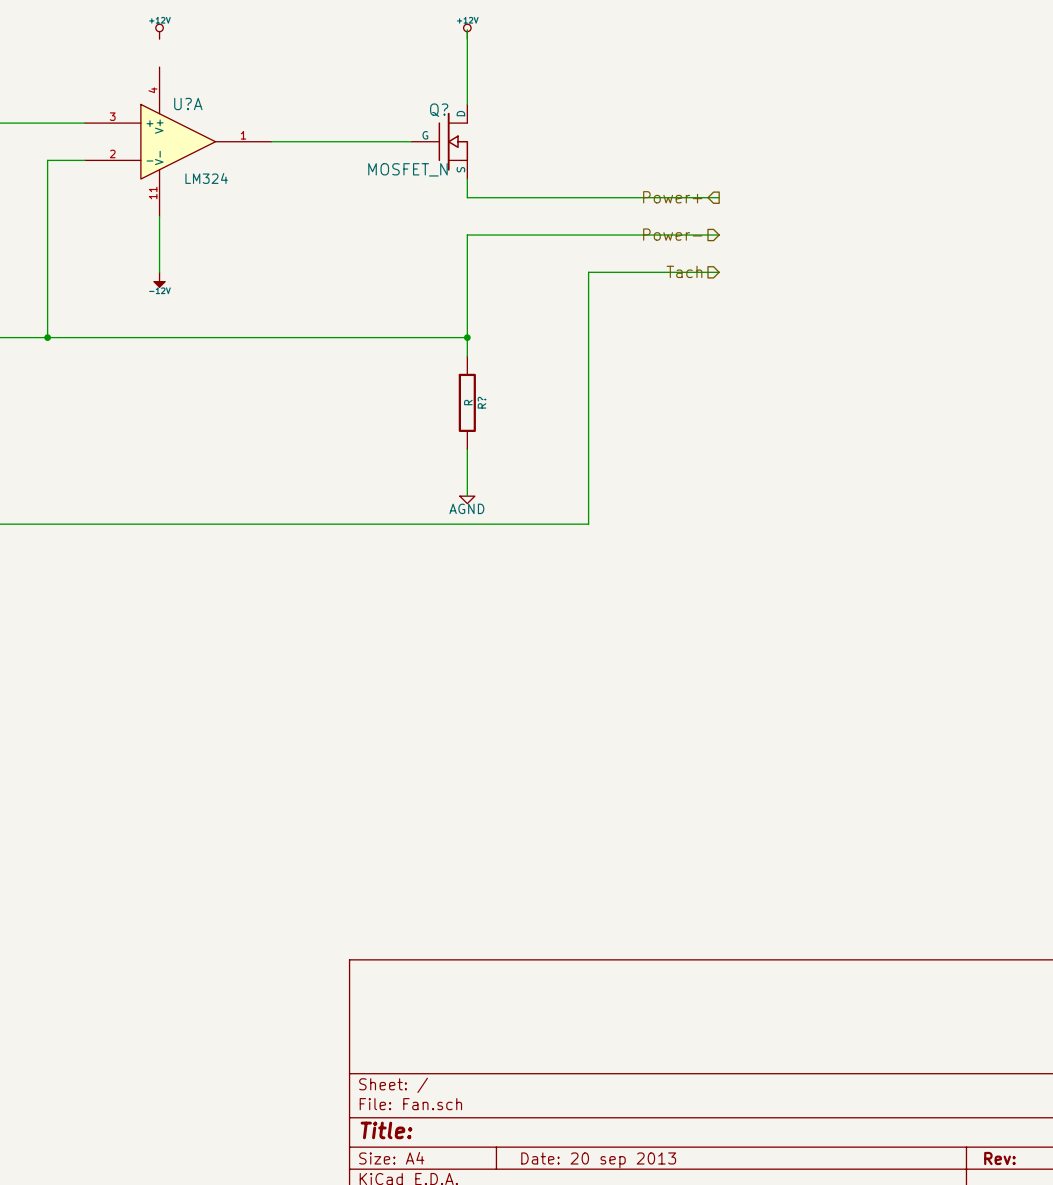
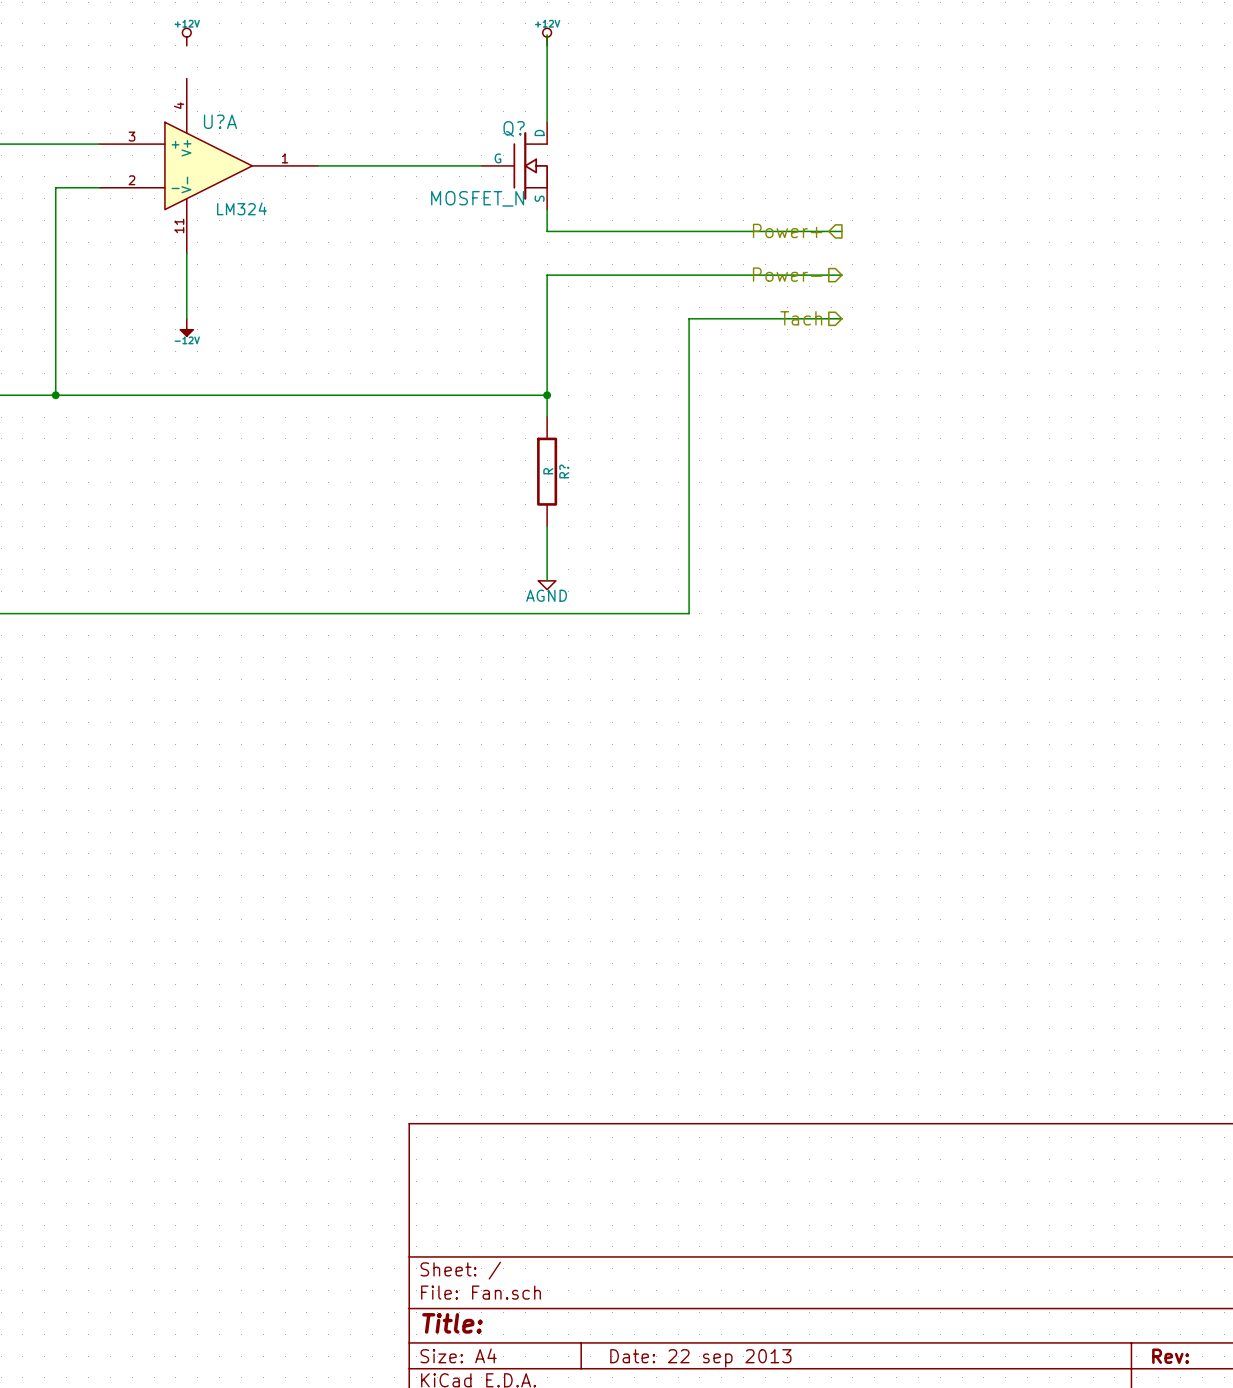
title block: Date: 20 sep 2013 (598, 1160) -> Date: 22 sep 2013 (700, 1358)

